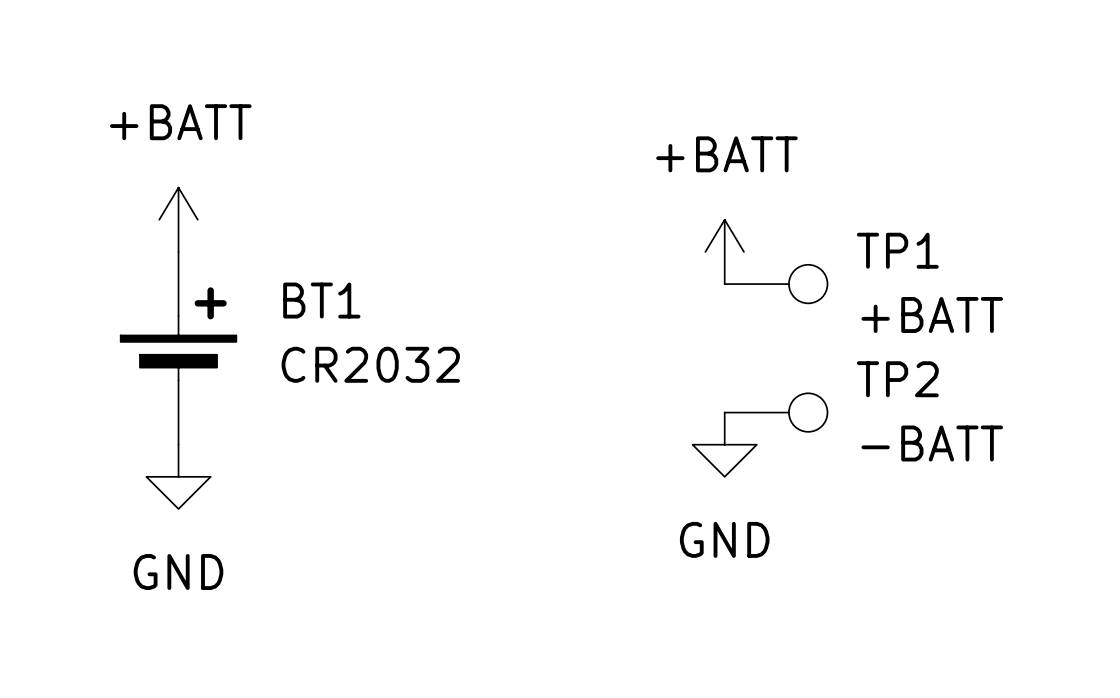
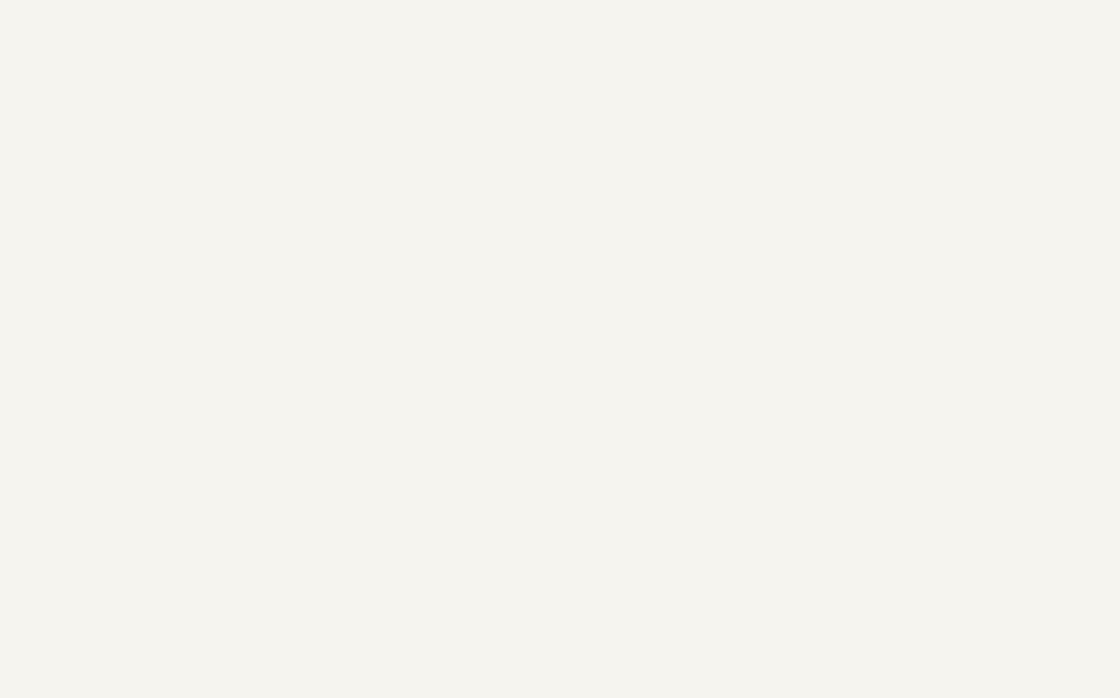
power symbol: +BATT (178, 219) -> none
power symbol: +BATT (724, 251) -> none
TP1: +BATT (776, 284) -> none
BT1: CR2032 (178, 348) -> none
TP2: -BATT (776, 412) -> none
power symbol: GND (724, 444) -> none
power symbol: GND (178, 476) -> none

